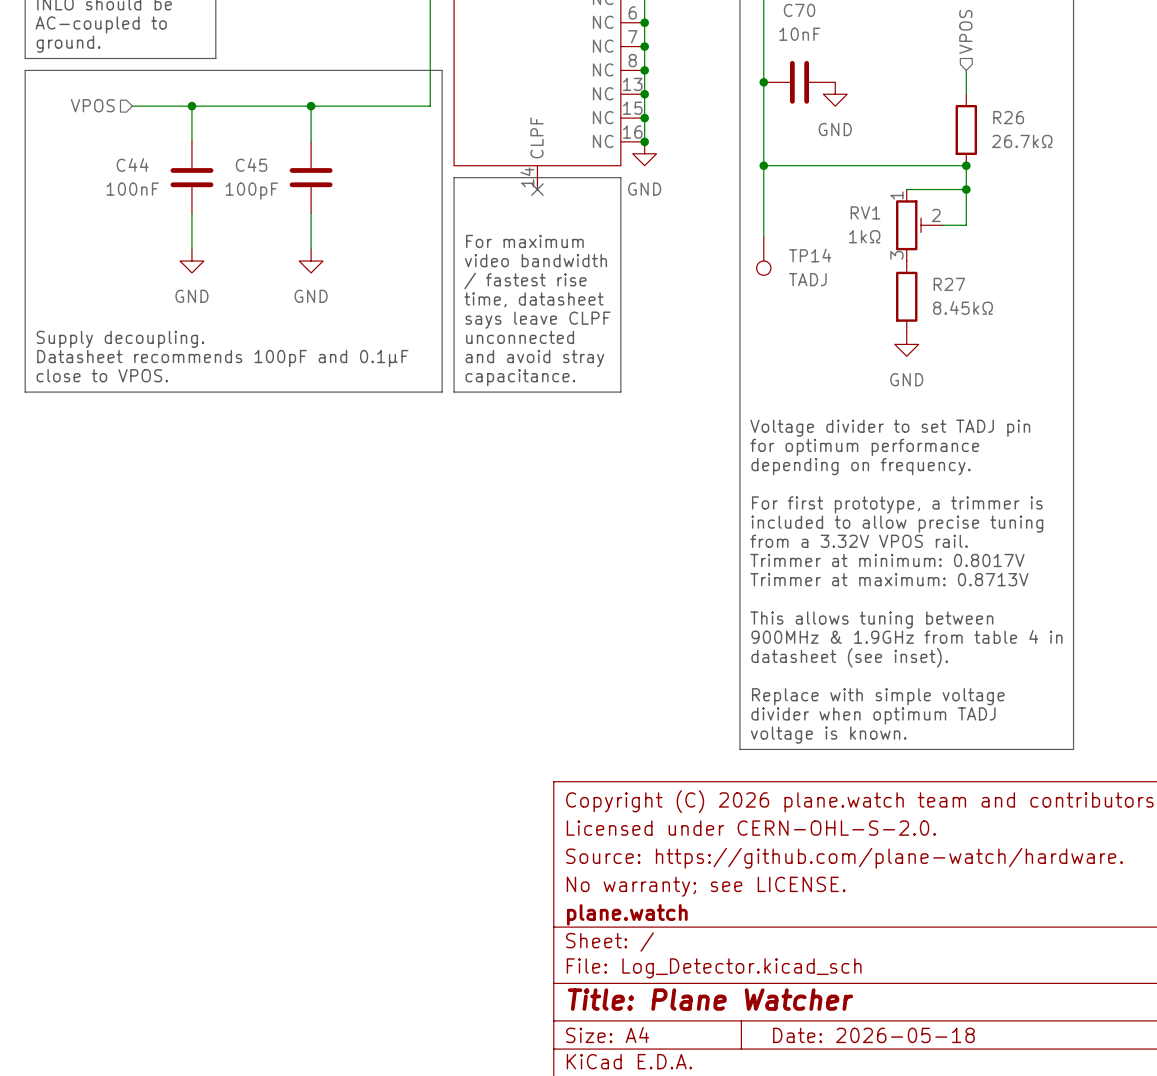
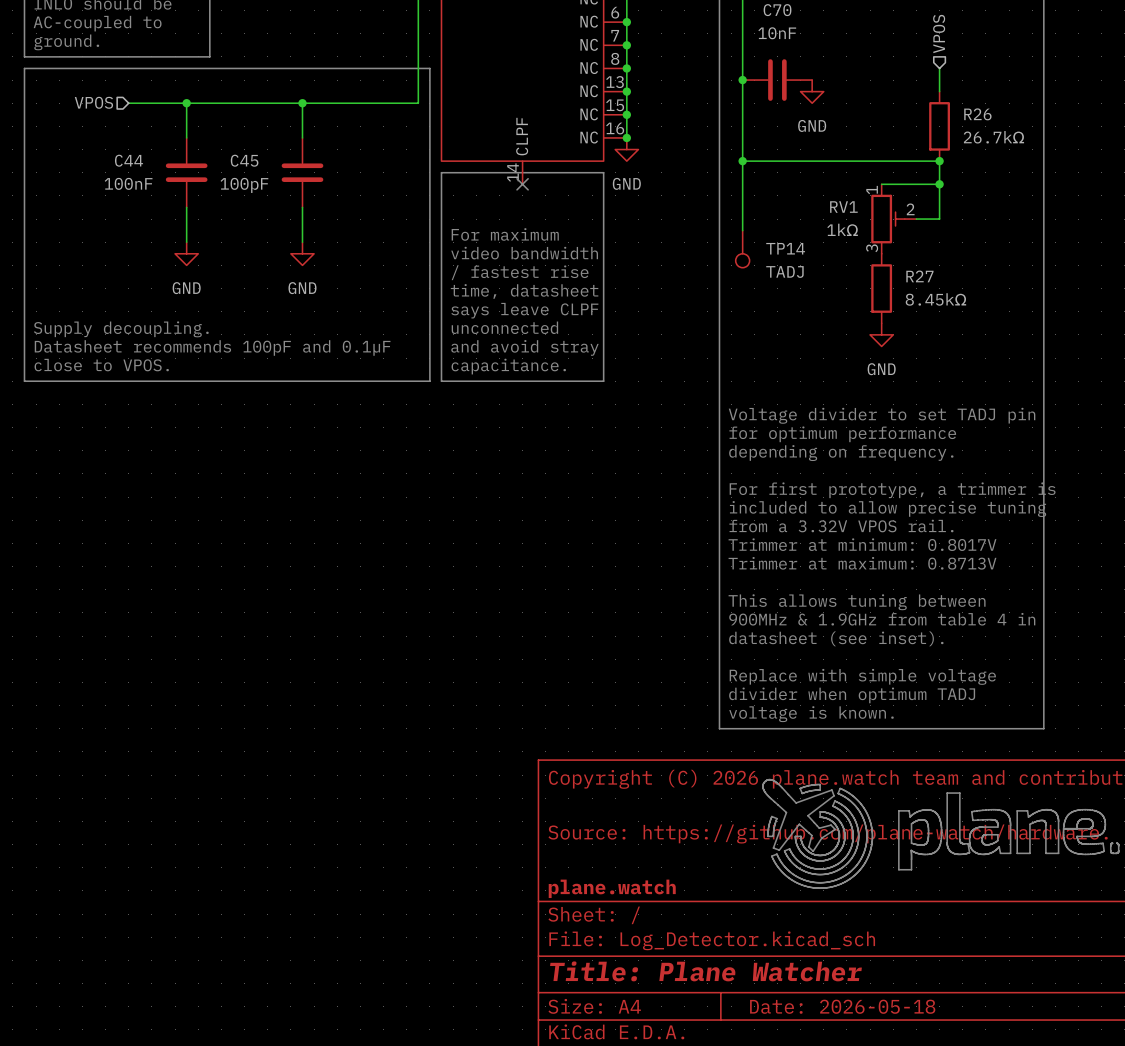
line: none -> (769, 779) (763, 783) (764, 790) (786, 812) (773, 848) (779, 850) (799, 824) (811, 835) (808, 847) (813, 851) (821, 838) (835, 829) (831, 825) (819, 828) (807, 815) (834, 795) (831, 790) (796, 802) (778, 783) (769, 779)
line: none -> (818, 784) (808, 785) (800, 788) (802, 793) (820, 790) (818, 784)
line: none -> (840, 788) (838, 793) (854, 804) (864, 821) (866, 838) (862, 855) (855, 866) (846, 875) (833, 880) (820, 882) (808, 881) (797, 876) (785, 867) (776, 854) (771, 856) (783, 873) (798, 883) (818, 888) (838, 884) (856, 873) (867, 857) (872, 836) (868, 816) (857, 799) (840, 788)
line: none -> (947, 793) (948, 847) (955, 853) (968, 853) (968, 843) (962, 843) (959, 840) (959, 793) (947, 793)
line: none -> (834, 801) (832, 806) (844, 813) (851, 826) (853, 837) (850, 849) (838, 863) (820, 869) (811, 867) (801, 863) (789, 848) (784, 850) (792, 863) (804, 871) (819, 874) (834, 872) (846, 864) (855, 851) (858, 837) (856, 822) (848, 810) (834, 801)
title block: Licensed under CERN-OHL-S-2.0. (751, 828) -> none
line: none -> (925, 809) (917, 811) (910, 817) (909, 810) (898, 810) (898, 869) (911, 869) (911, 850) (919, 853) (929, 854) (935, 851) (939, 846) (941, 832) (939, 819) (934, 811) (925, 809)
line: none -> (991, 809) (971, 811) (972, 820) (994, 820) (997, 827) (980, 827) (973, 829) (969, 836) (970, 847) (974, 851) (980, 854) (990, 852) (999, 846) (1000, 853) (1010, 853) (1009, 817) (1003, 811) (991, 809)
line: none -> (1045, 809) (1028, 817) (1027, 810) (1017, 810) (1017, 853) (1029, 853) (1029, 824) (1041, 820) (1045, 823) (1045, 853) (1058, 853) (1057, 816) (1053, 811) (1045, 809)
line: none -> (820, 811) (820, 817) (831, 820) (838, 829) (838, 840) (833, 849) (824, 855) (813, 854) (804, 847) (800, 836) (795, 836) (797, 845) (802, 853) (810, 859) (820, 860) (829, 859) (837, 853) (843, 845) (844, 836) (843, 826) (837, 819) (829, 813) (820, 811)
line: none -> (771, 816) (768, 826) (767, 836) (773, 836) (776, 818) (771, 816)
line: none -> (921, 819) (925, 820) (927, 823) (927, 841) (923, 844) (911, 843) (911, 823) (921, 819)
line: none -> (1063, 828) (1065, 843) (1071, 851) (1085, 854) (1104, 851) (1103, 843) (1082, 843) (1078, 841) (1077, 836) (1096, 836) (1102, 832) (1105, 821) (1098, 812) (1085, 809) (1072, 811) (1066, 817) (1063, 828)
line: none -> (1063, 828) (1088, 828) (1090, 828) (1092, 826) (1092, 821) (1088, 819) (1080, 819) (1077, 822) (1077, 824) (1077, 826) (1076, 827) (1076, 828)
line: none -> (983, 835) (997, 834) (997, 840) (985, 844) (982, 842) (982, 836)
line: none -> (1110, 845) (1110, 851)
line: none -> (1118, 845) (1118, 851)
line: none -> (1112, 853) (1116, 853)
title block: No warranty; see LICENSE. (706, 886) -> none

